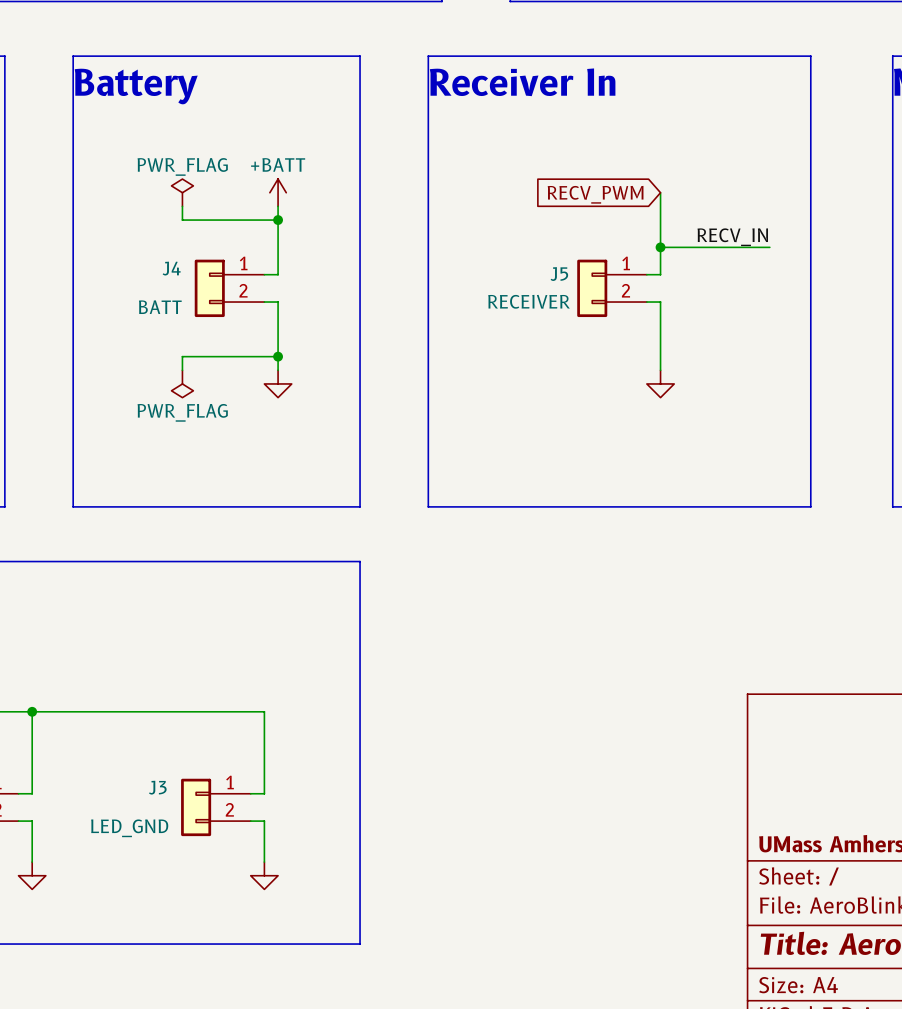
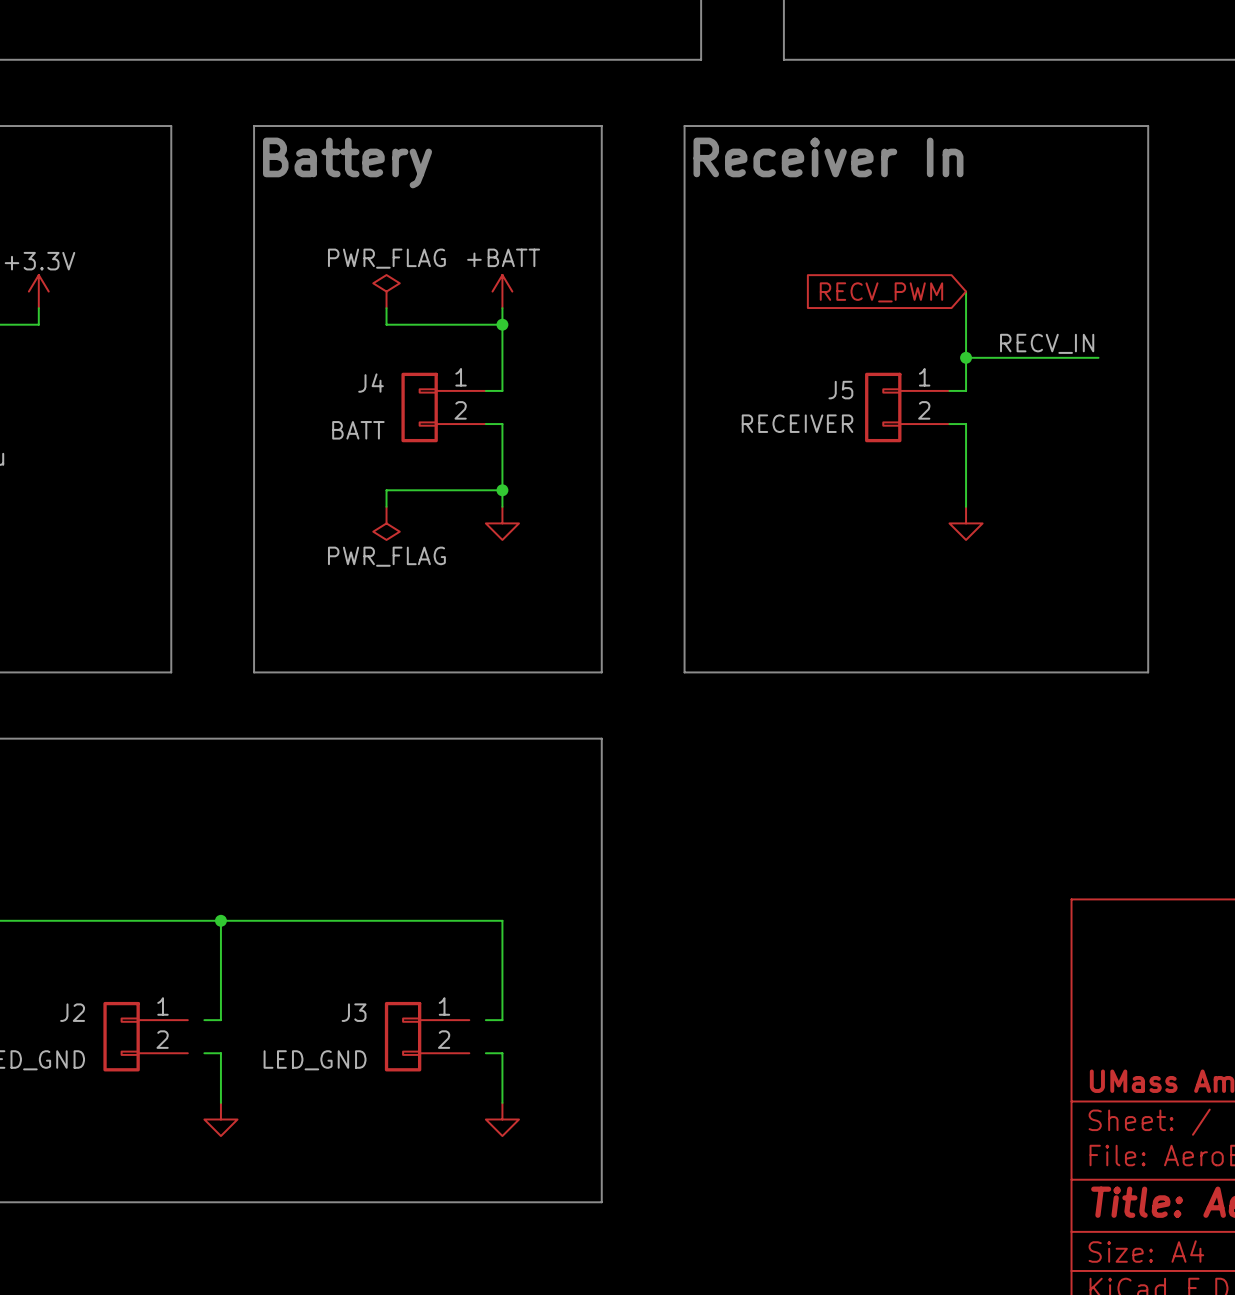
wire: (32, 711) (32, 793) (18, 793) -> (220, 920) (220, 1020) (204, 1020)
junction position: (32, 711) -> (220, 920)
wire: (264, 711) (264, 793) (250, 793) -> (485, 920) (502, 920) (502, 1020) (485, 1020)
wire: (18, 821) (32, 821) (32, 862) -> (204, 1053) (220, 1053) (220, 1102)
wire: (250, 821) (264, 821) (264, 862) -> (485, 1053) (502, 1053) (502, 1102)
power symbol position: (32, 875) -> (220, 1119)
power symbol position: (264, 875) -> (502, 1119)

